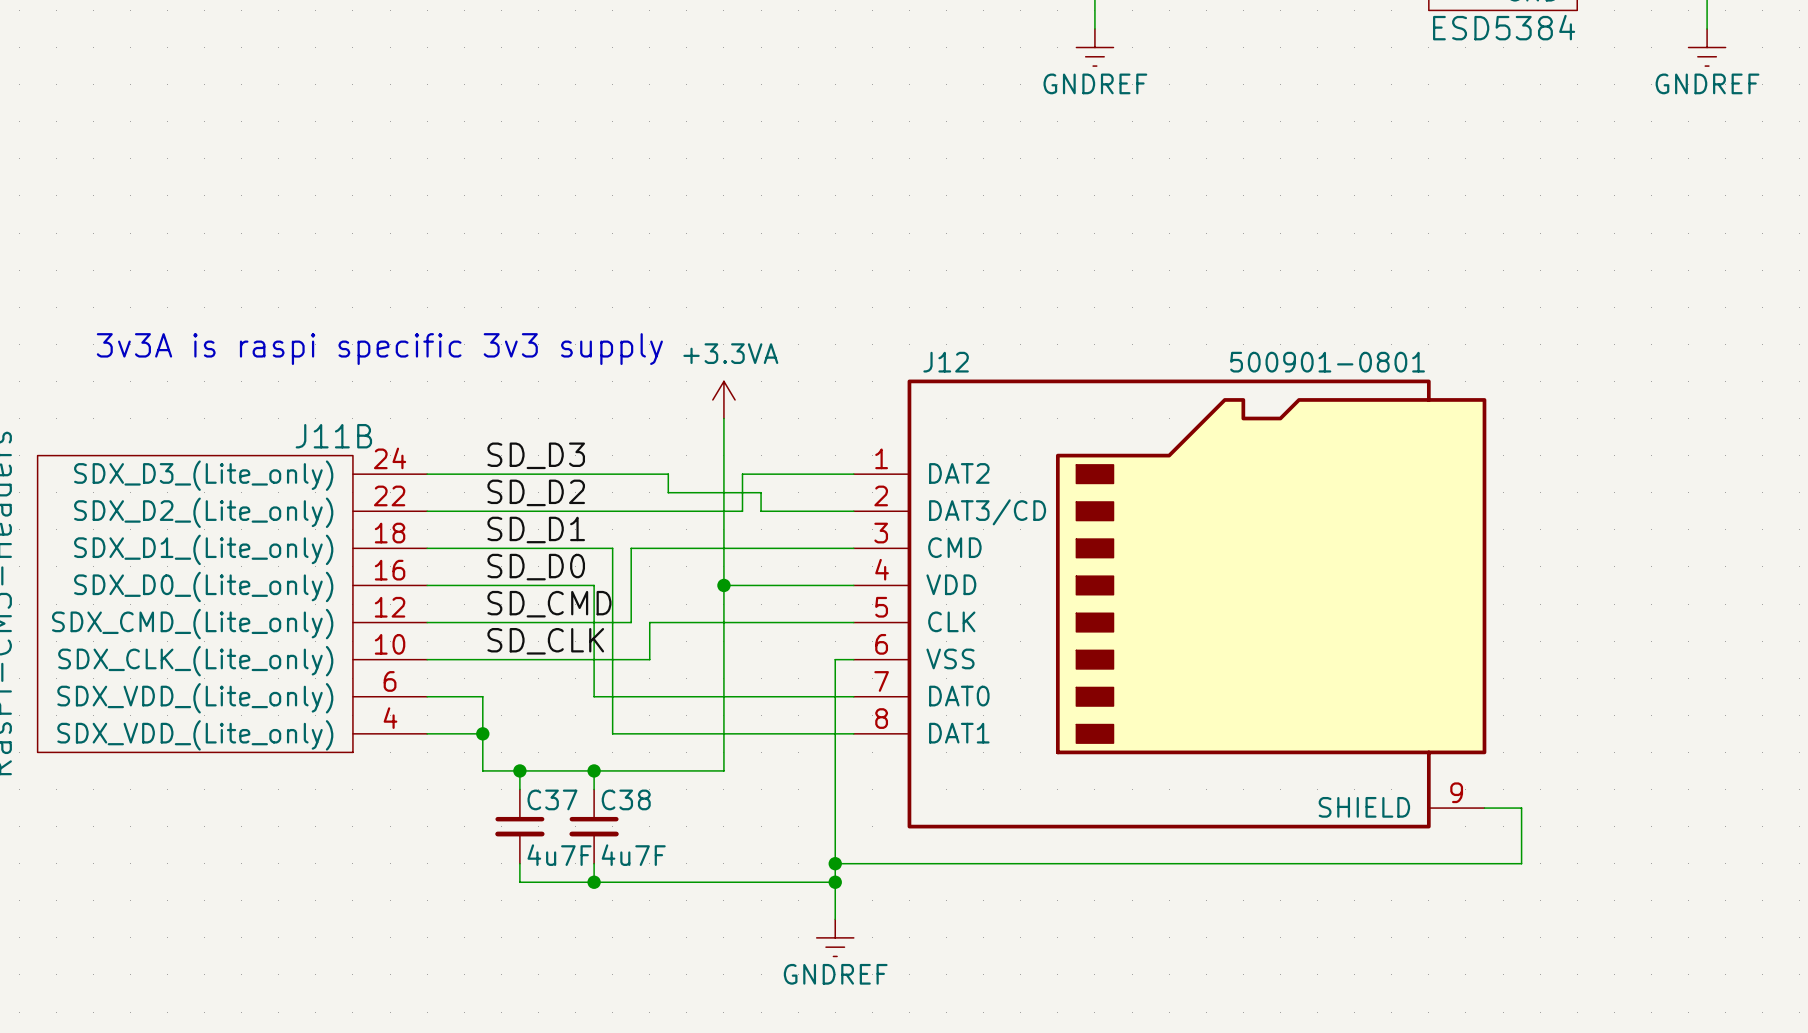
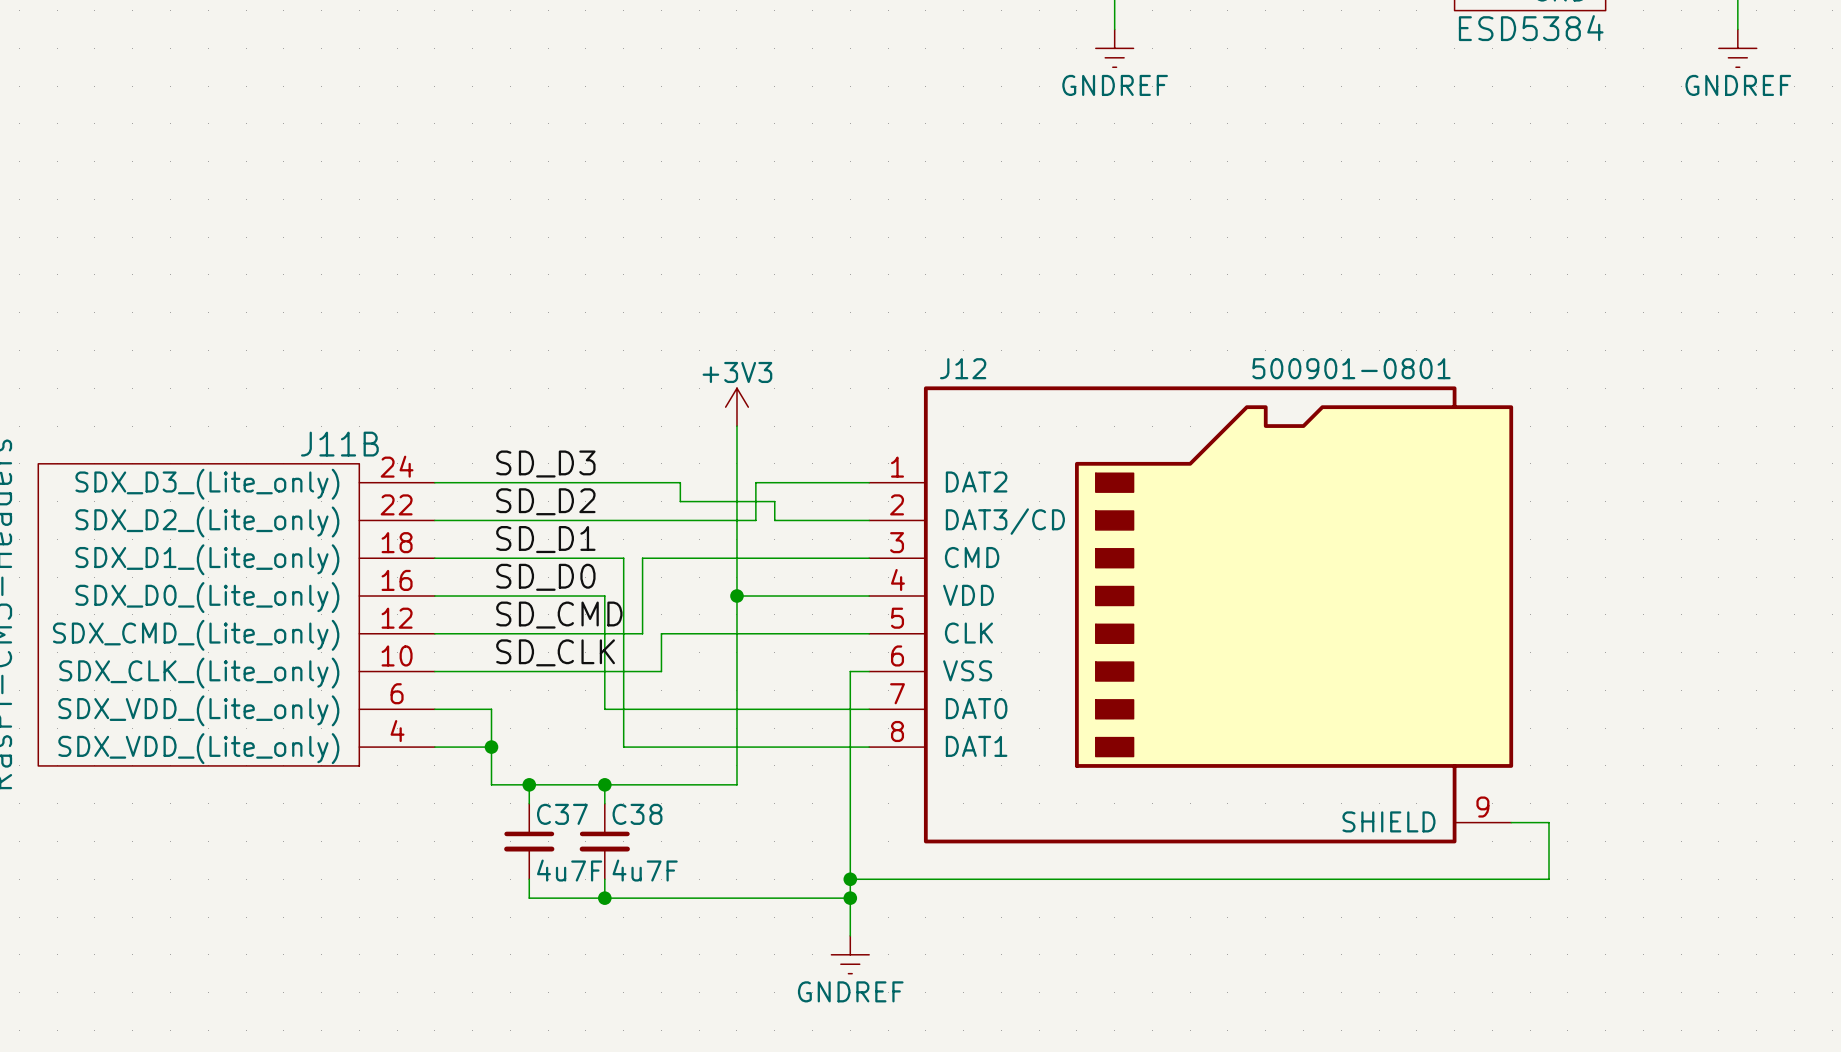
text: 3v3A is raspi specific 3v3 supply (379, 349) -> none
power symbol: +3.3VA (723, 399) -> +3V3 (736, 407)

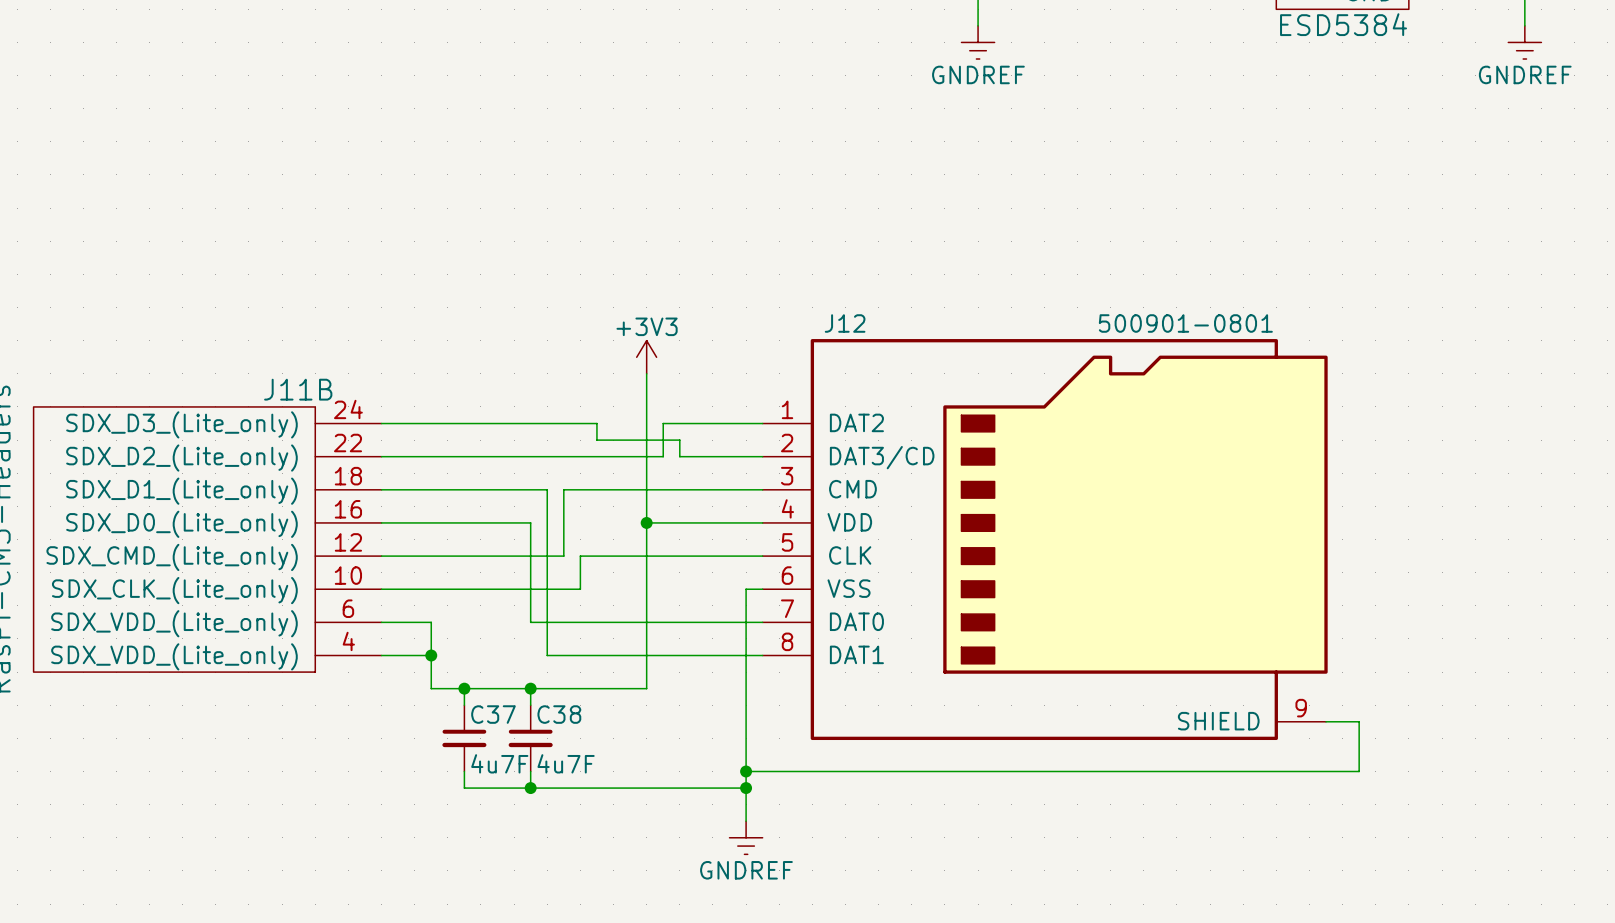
label: SD_D3 (545, 464) -> none
label: SD_D2 (545, 501) -> none
label: SD_D1 (545, 539) -> none
label: SD_D0 (545, 577) -> none
label: SD_CMD (559, 615) -> none
label: SD_CLK (555, 652) -> none

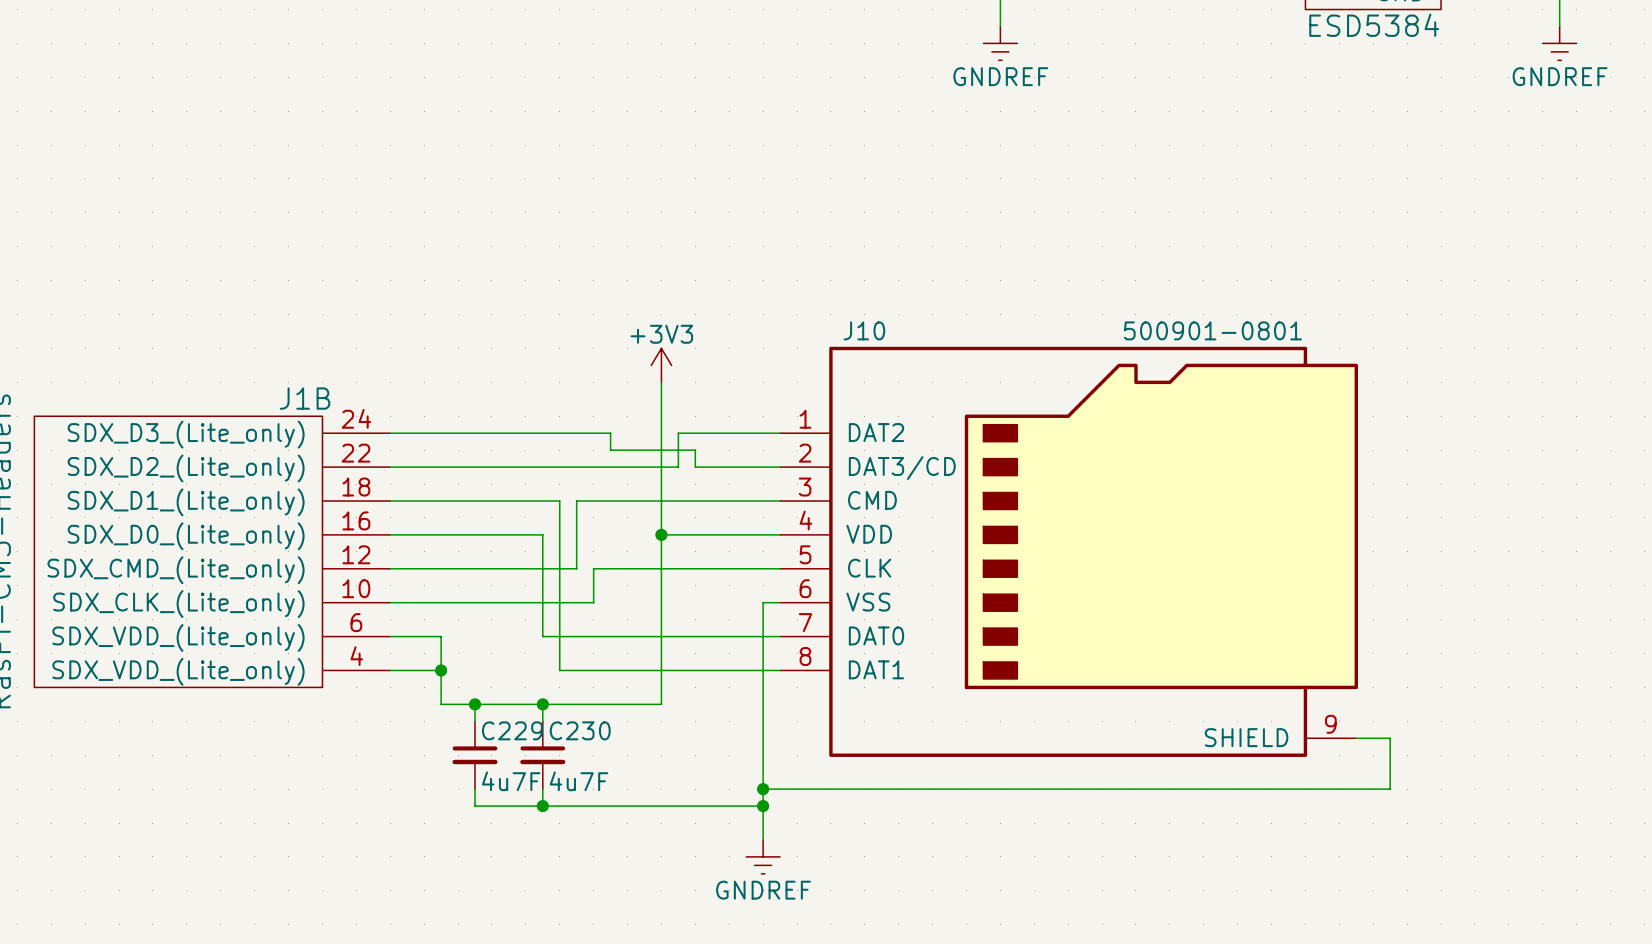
J12 name: J12 (845, 323) -> J10 (864, 330)
J11B name: J11B (298, 389) -> J1B (305, 398)
C37 name: C37 (493, 714) -> C229 (512, 730)
C38 name: C38 (559, 714) -> C230 (580, 730)

